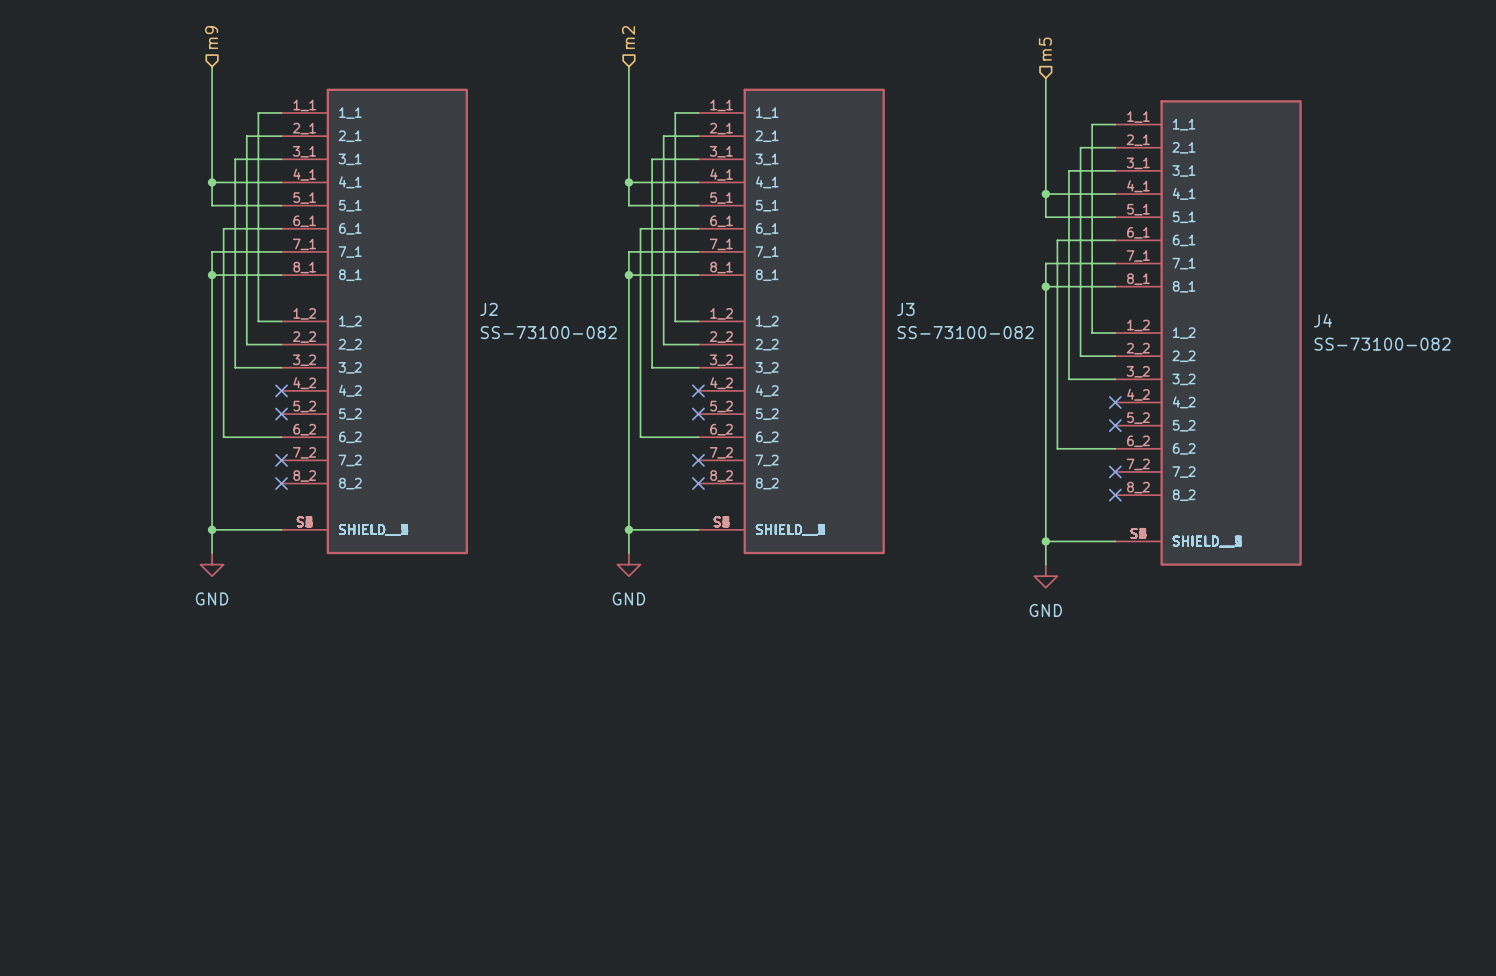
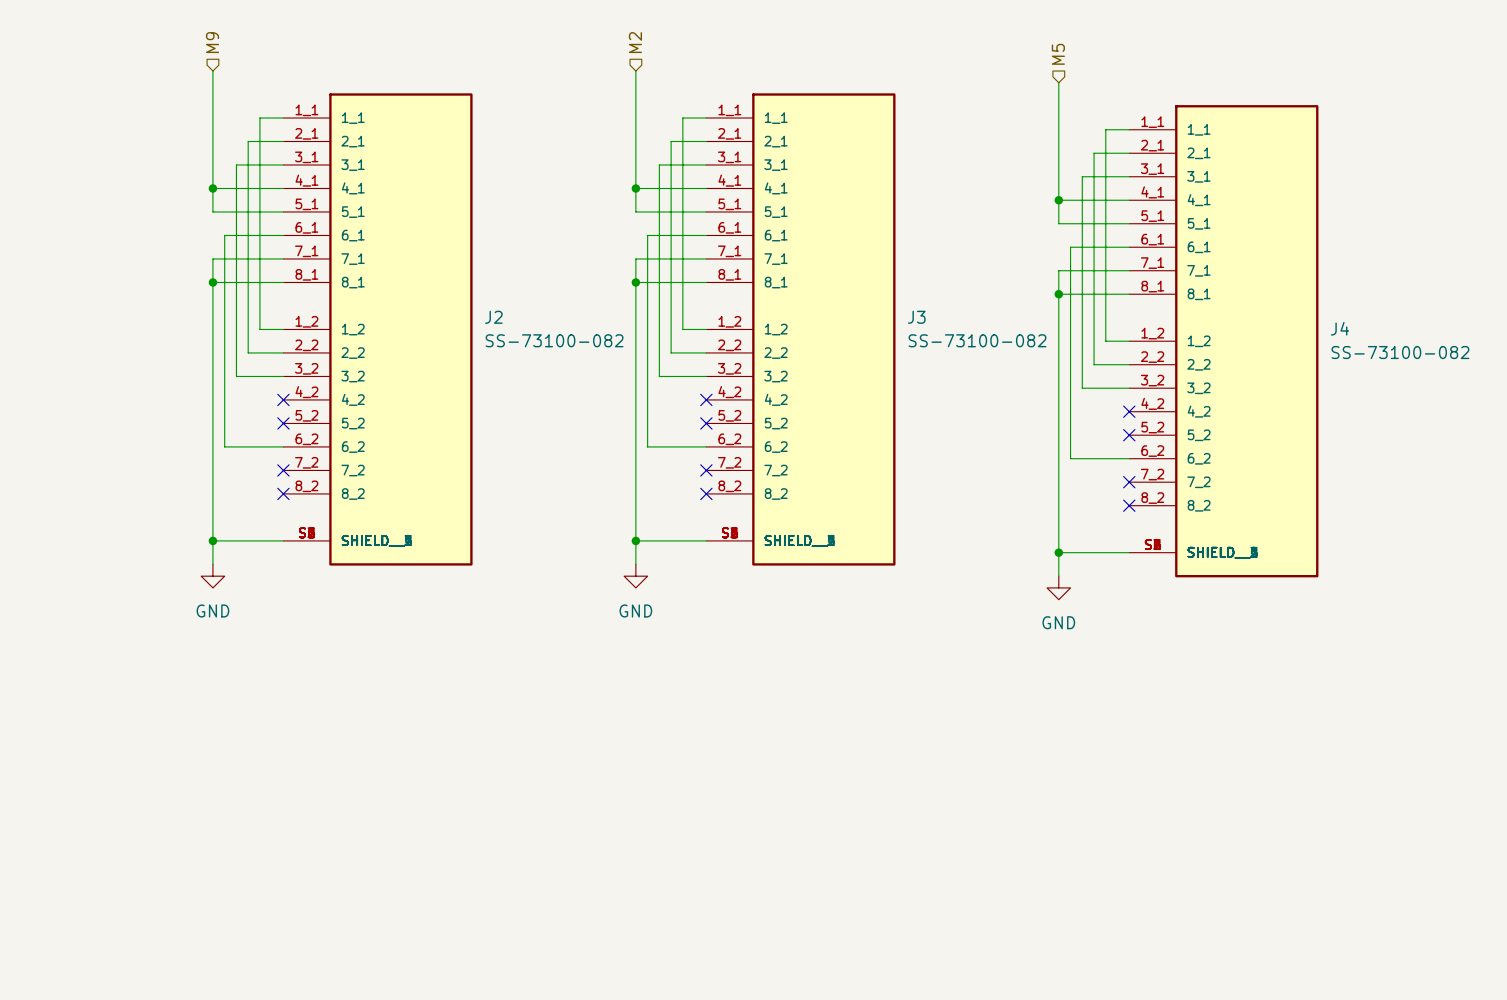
hierarchical label: m9 (211, 37) -> M9 (212, 42)
hierarchical label: m2 (628, 37) -> M2 (635, 42)
hierarchical label: m5 (1045, 49) -> M5 (1058, 54)

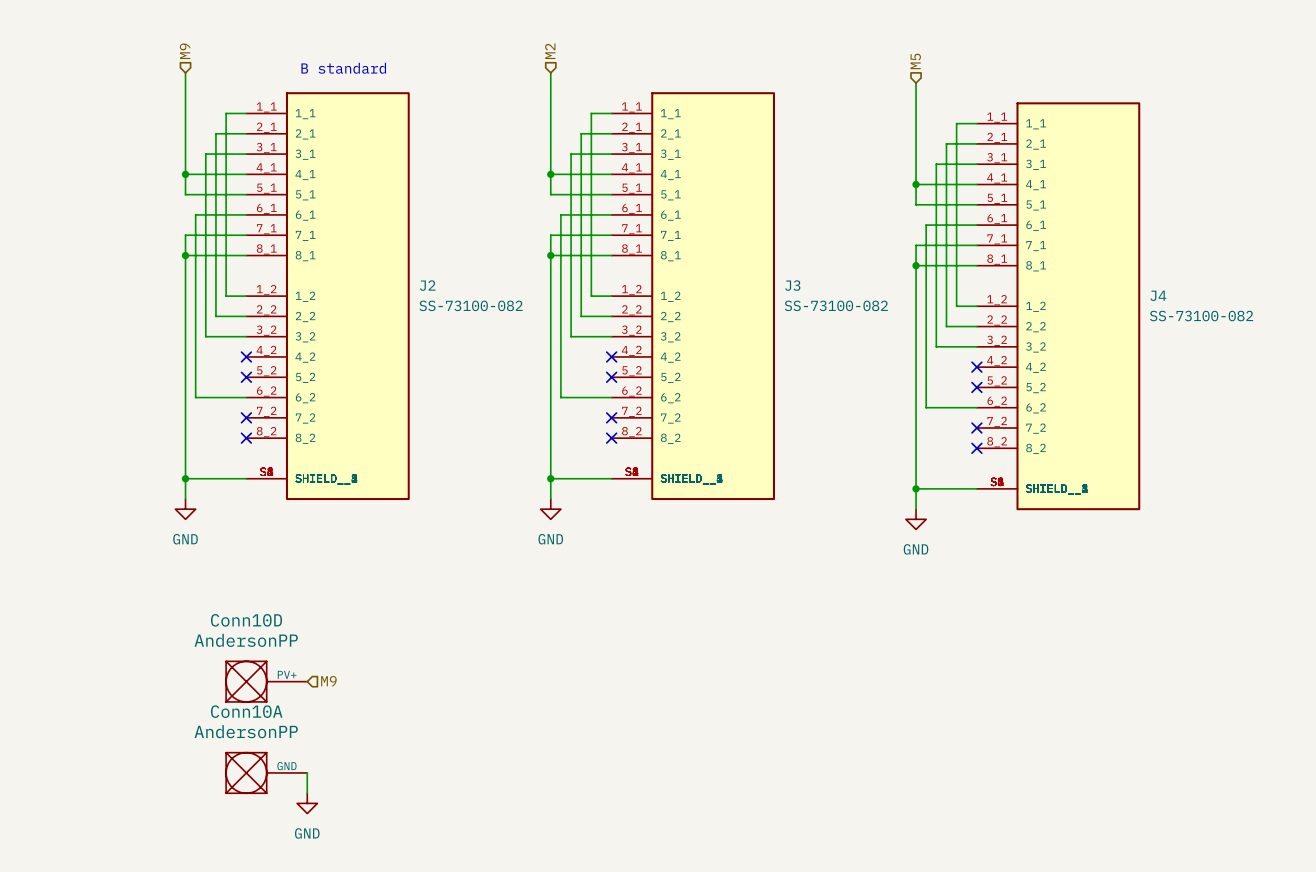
text: none -> B standard (343, 68)
Conn10D: none -> AndersonPP (266, 681)
hierarchical label: none -> M9 (328, 681)
Conn10A: none -> AndersonPP (266, 772)
wire: none -> (307, 772) (307, 793)
power symbol: none -> GND (307, 803)

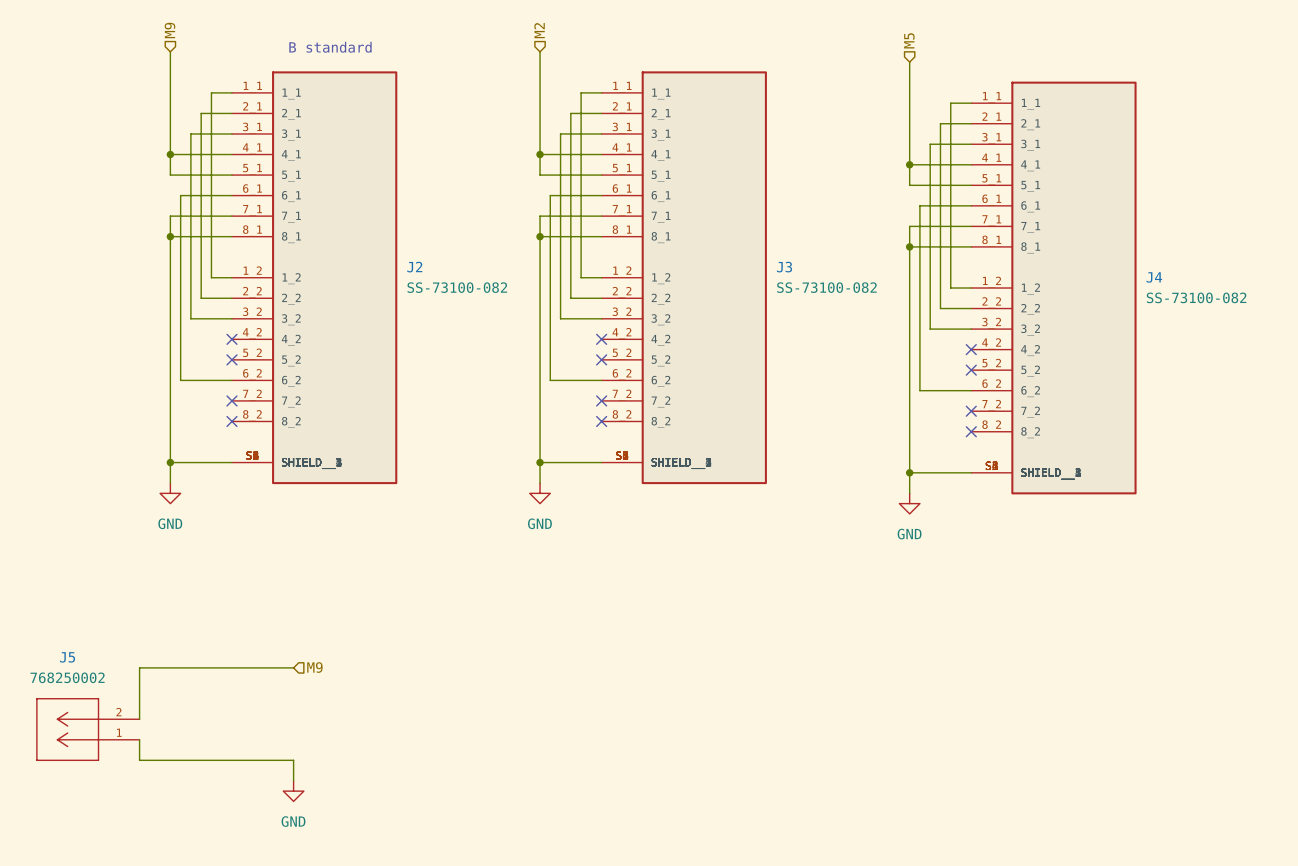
Conn10D: AndersonPP (266, 681) -> none
wire: none -> (293, 667) (139, 667) (139, 719)
J5: none -> 768250002 (87, 729)
wire: none -> (139, 739) (139, 760) (293, 760)
Conn10A: AndersonPP (266, 772) -> none

